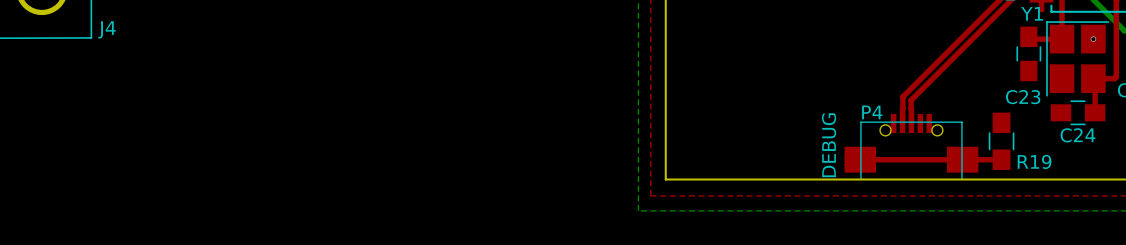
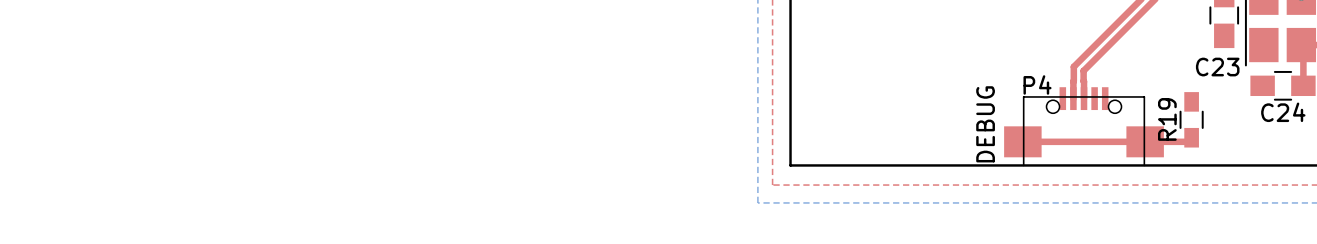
R19 footprint: [988, 112, 1015, 170] -> [1179, 92, 1204, 148]
R19 name rotation: 0° (1034, 161) -> 90° counterclockwise (1167, 119)
R19 name position: R19 (1034, 161) -> R19 (1167, 119)

